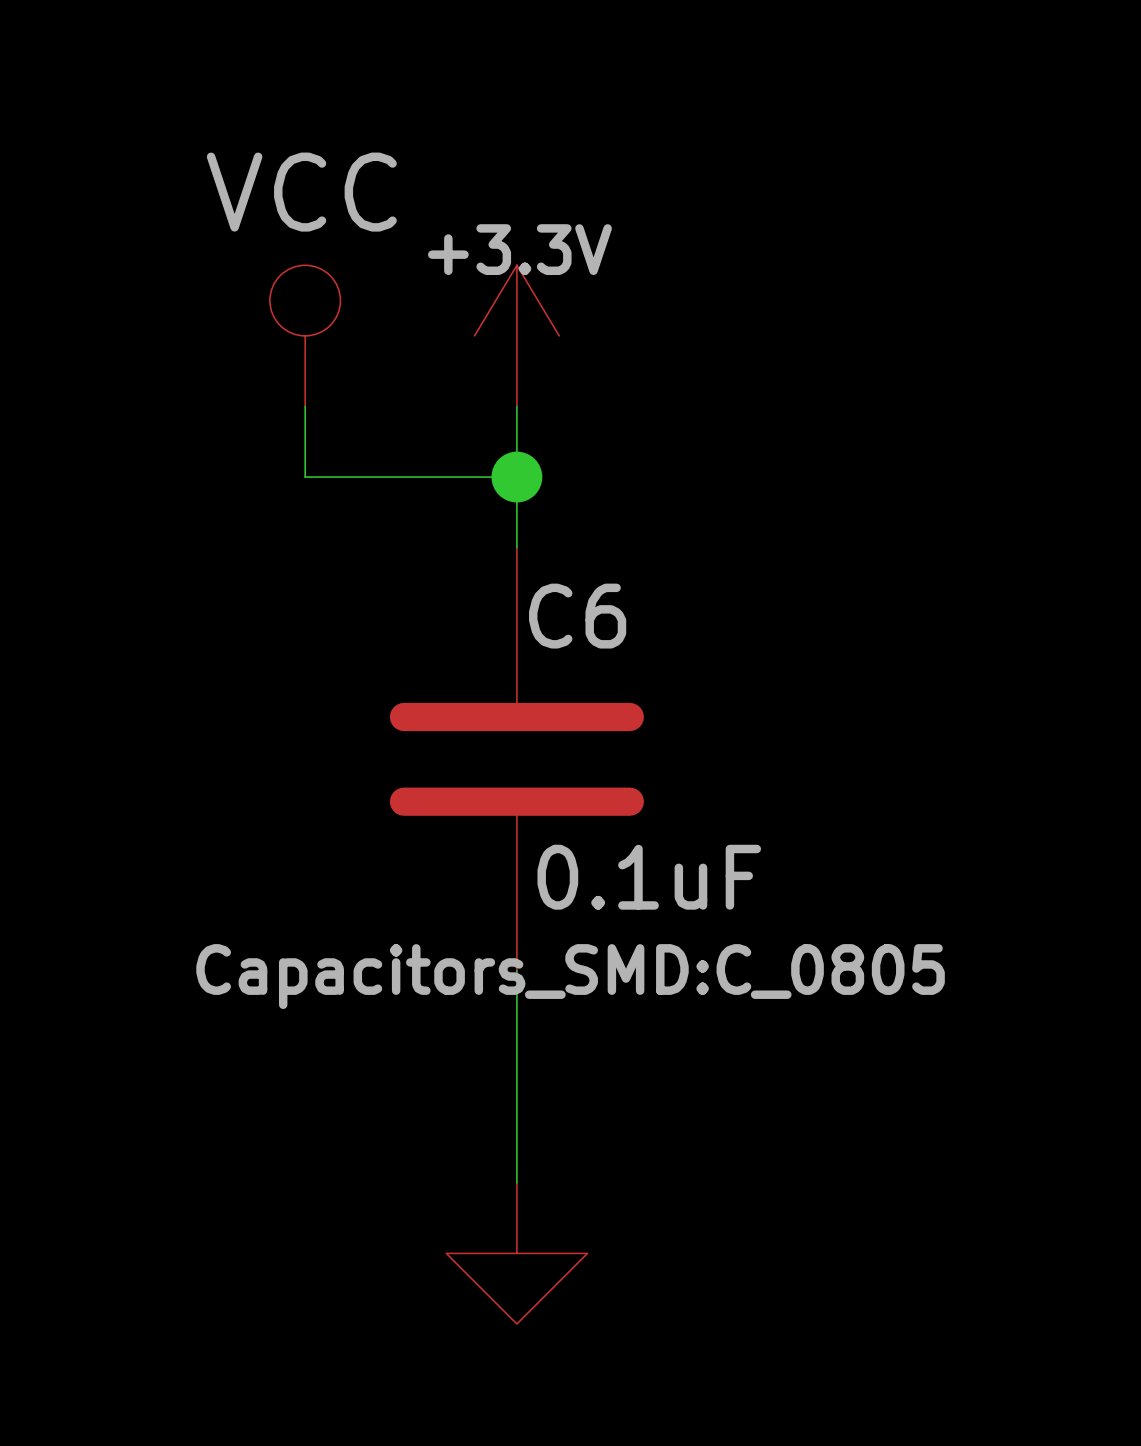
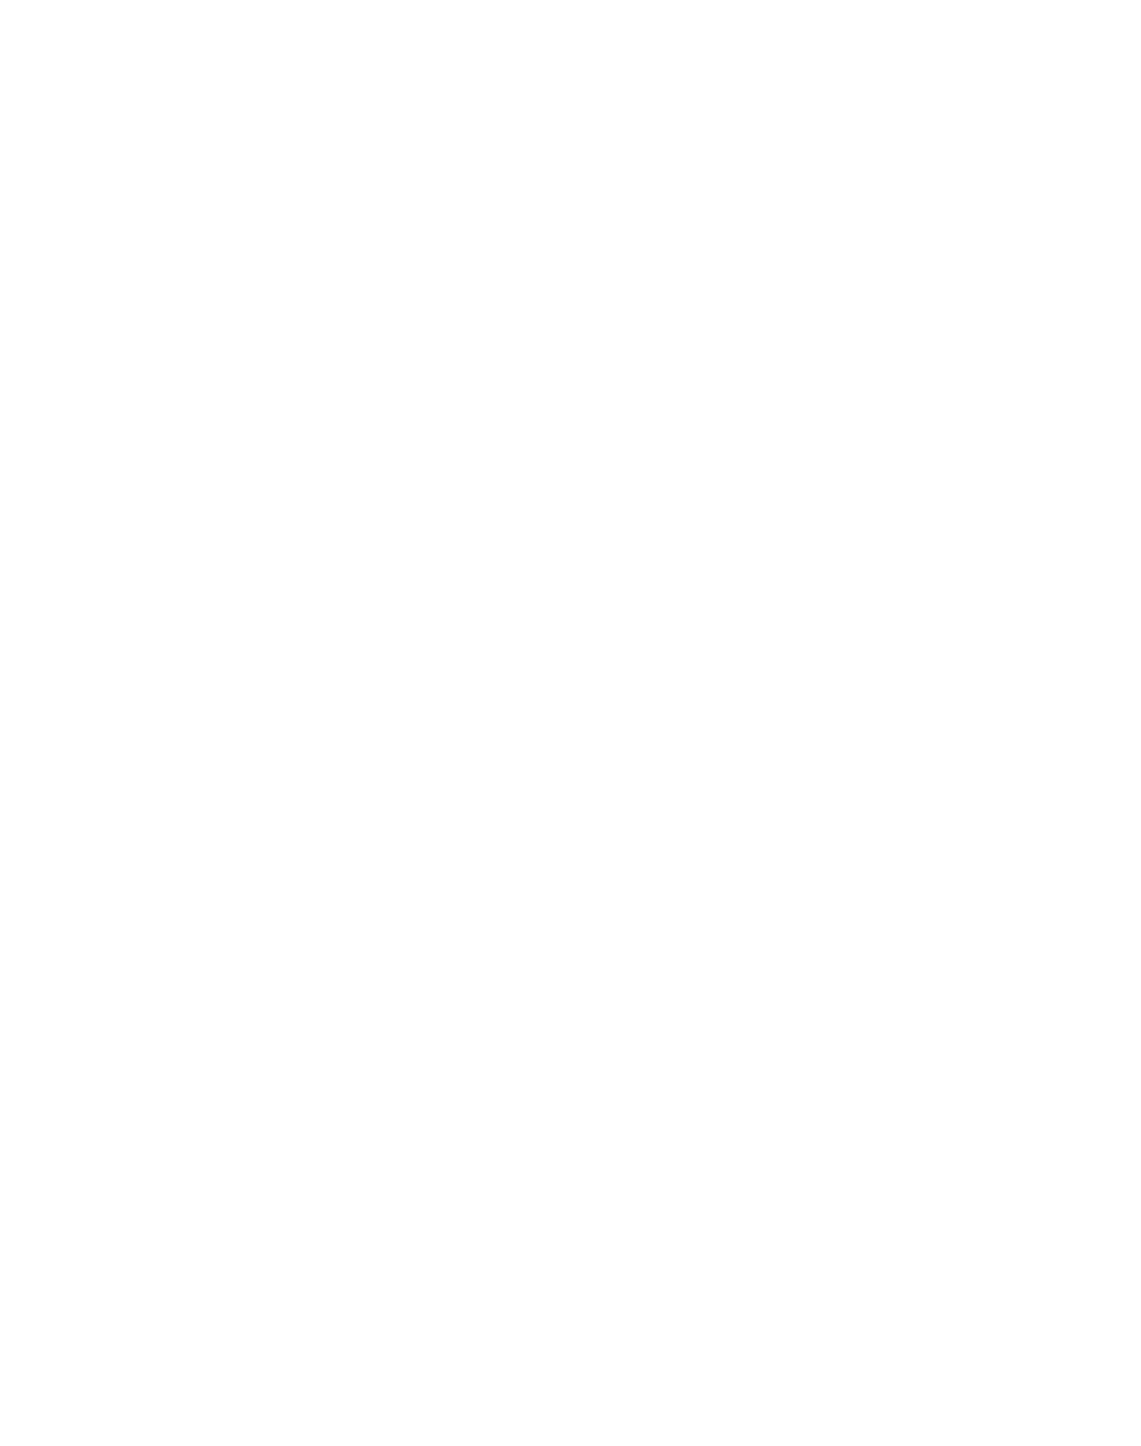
power symbol: VCC (305, 335) -> none
power symbol: +3.3V (516, 335) -> none
wire: (305, 406) (305, 477) (516, 477) -> none
wire: (516, 406) (516, 547) -> none
junction: (516, 477) -> none
C6: 0.1uF (516, 759) -> none
wire: (516, 971) (516, 1182) -> none
power symbol: (516, 1253) -> none

